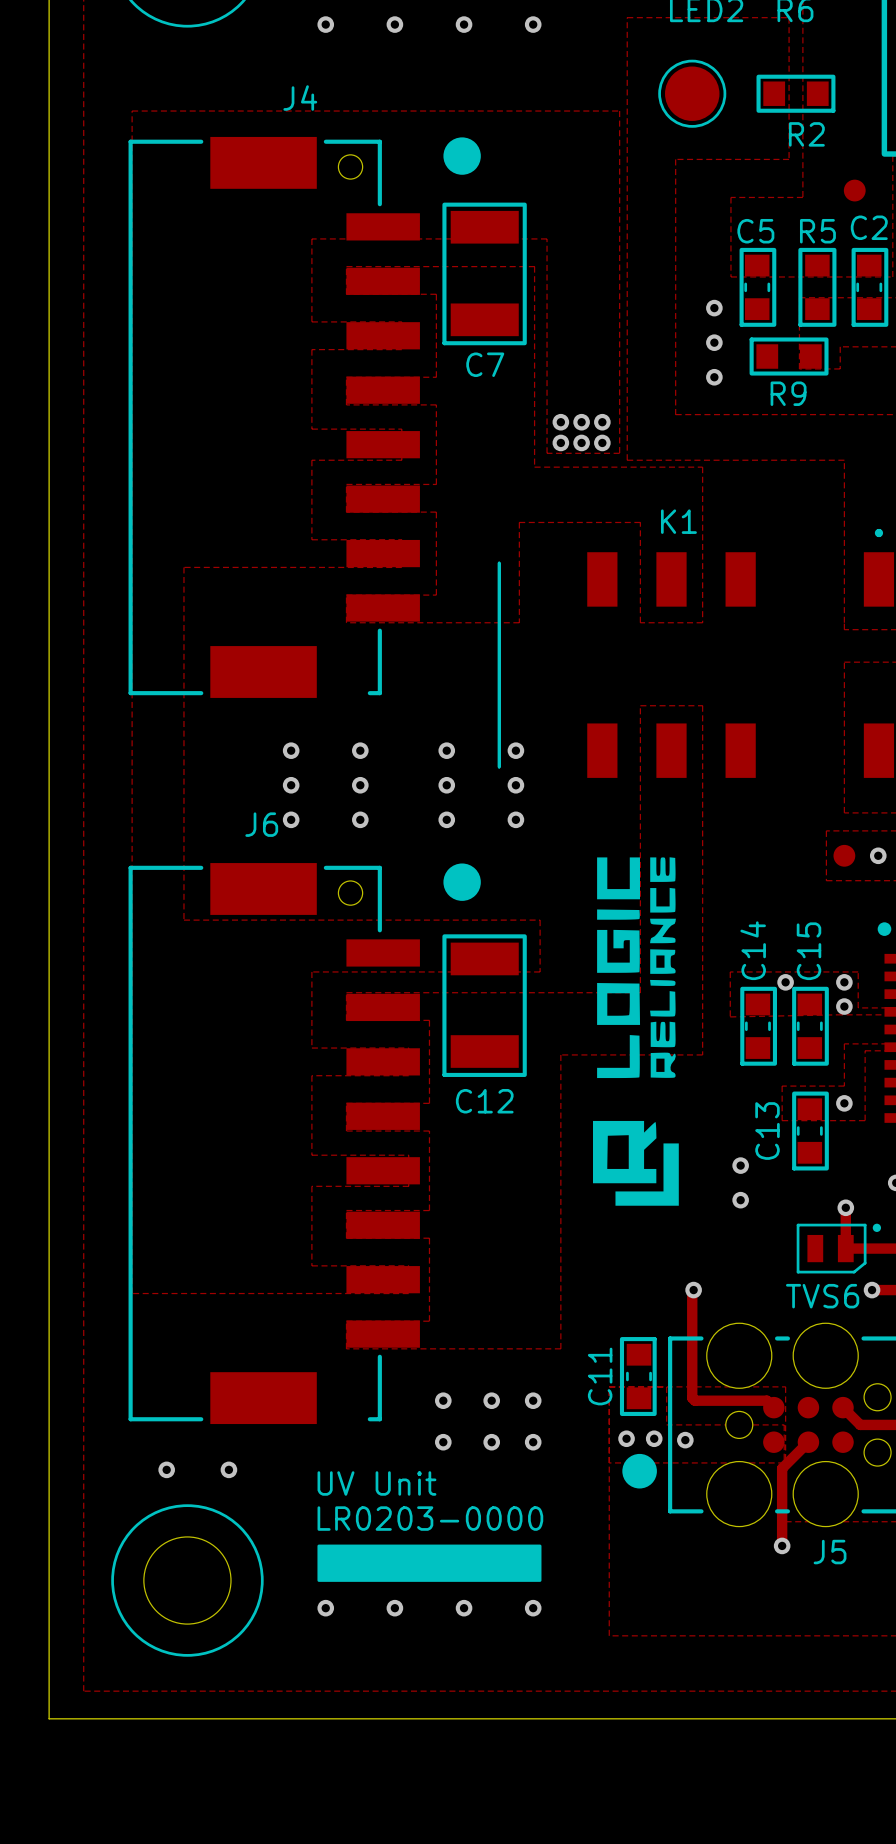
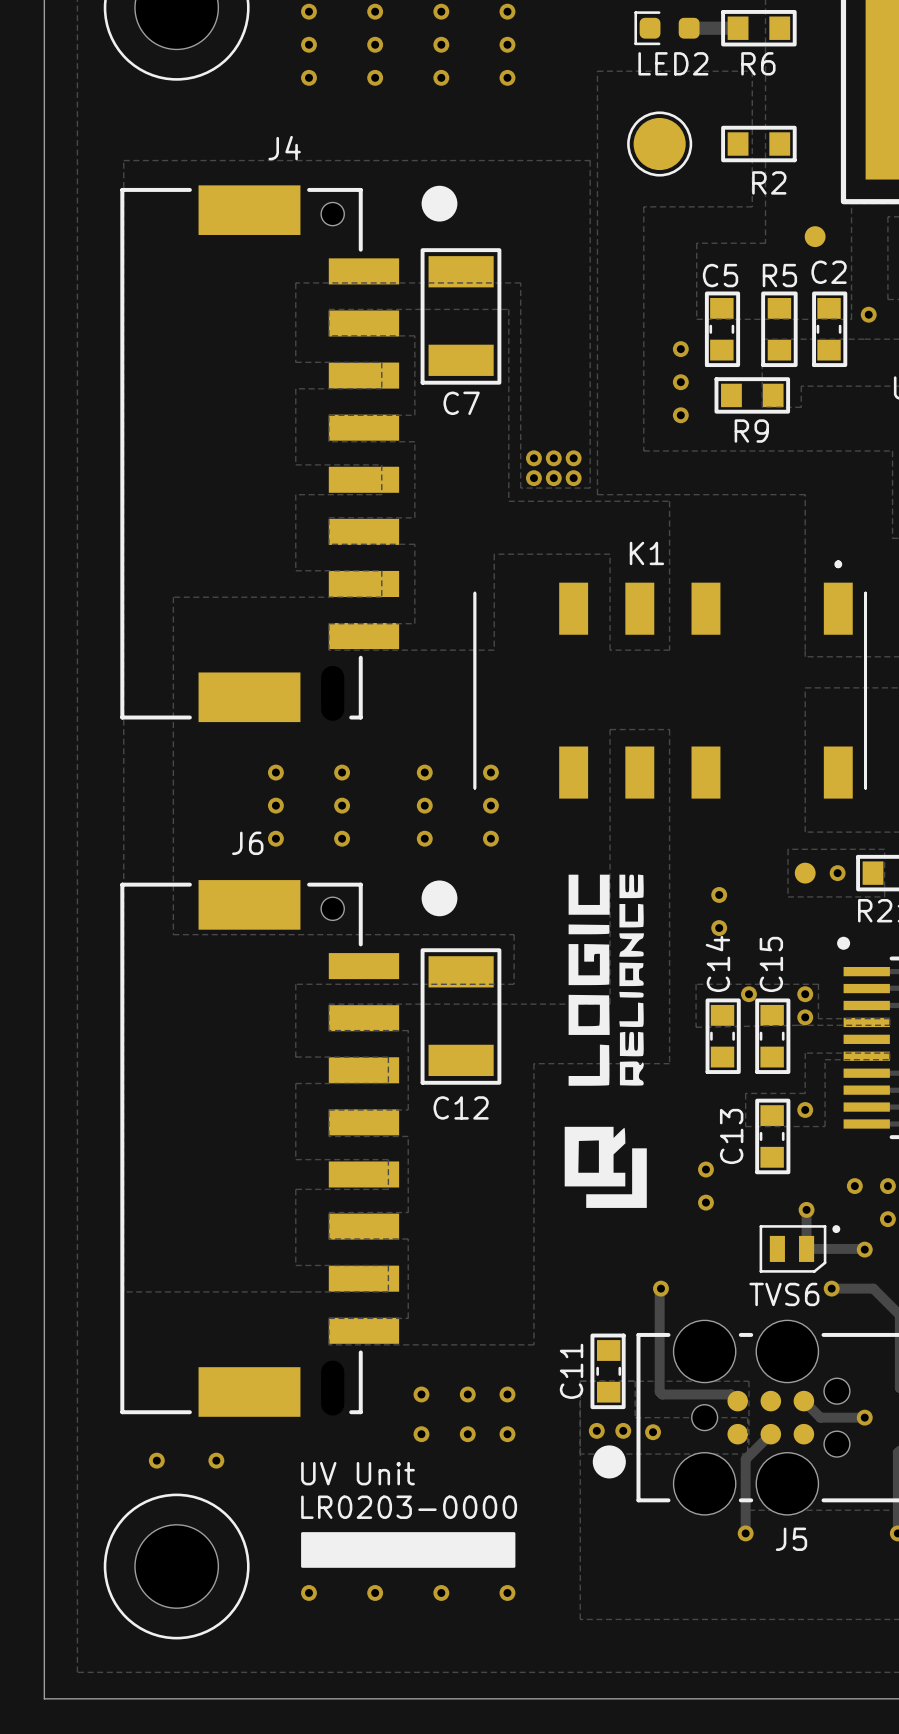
via: none -> (719, 894)
via: none -> (719, 928)

